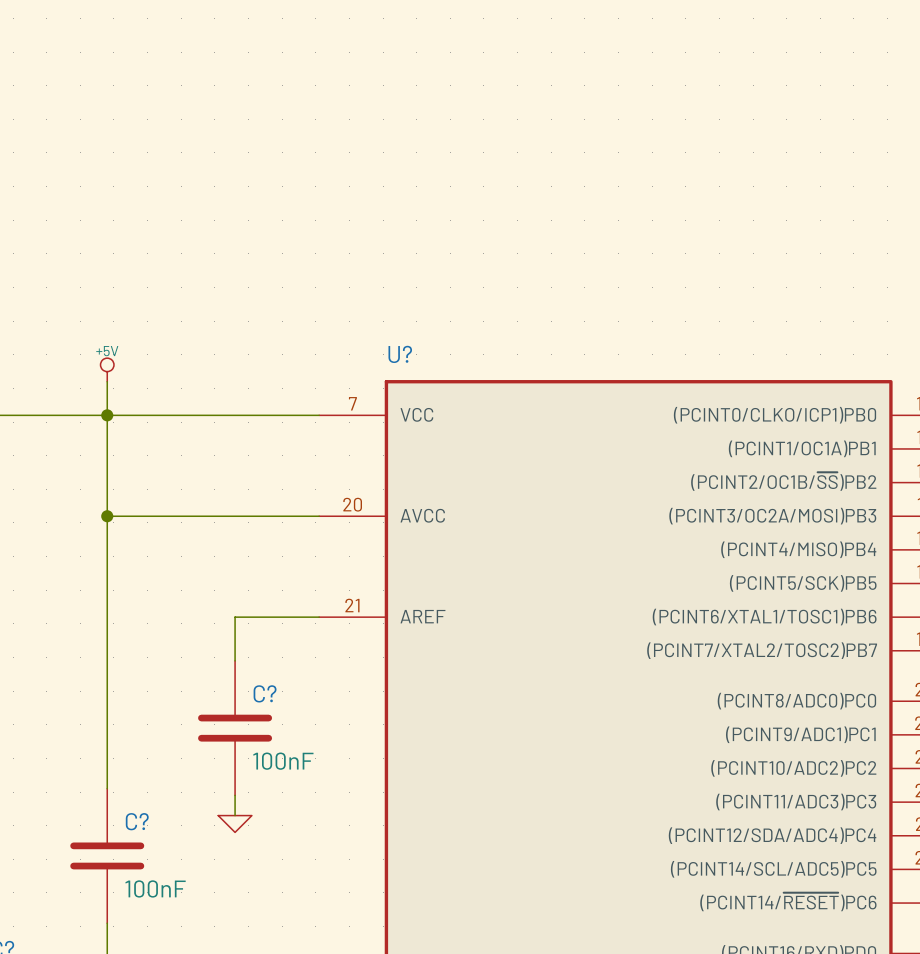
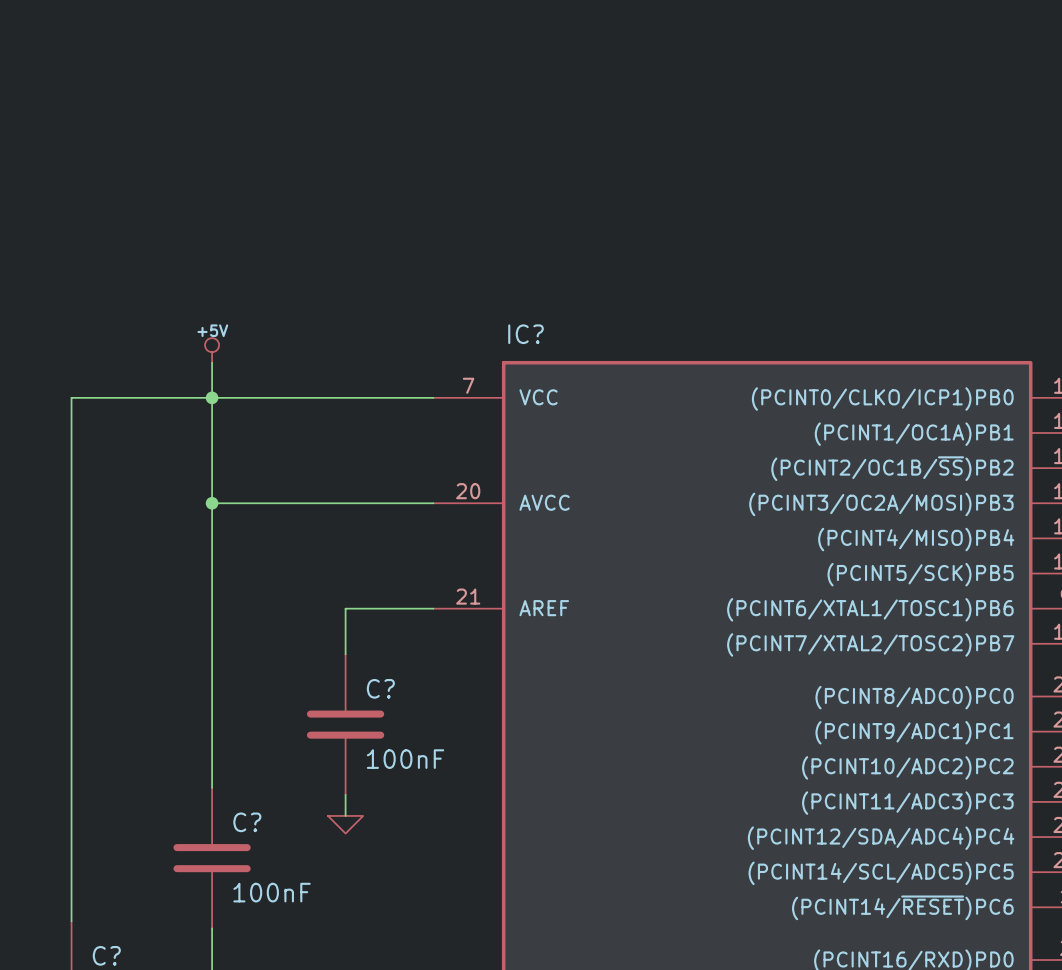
U? name: U? (400, 354) -> IC? (525, 334)

